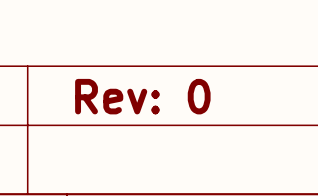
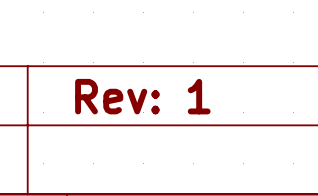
title block: Rev: 0 (142, 96) -> Rev: 1 (142, 96)

